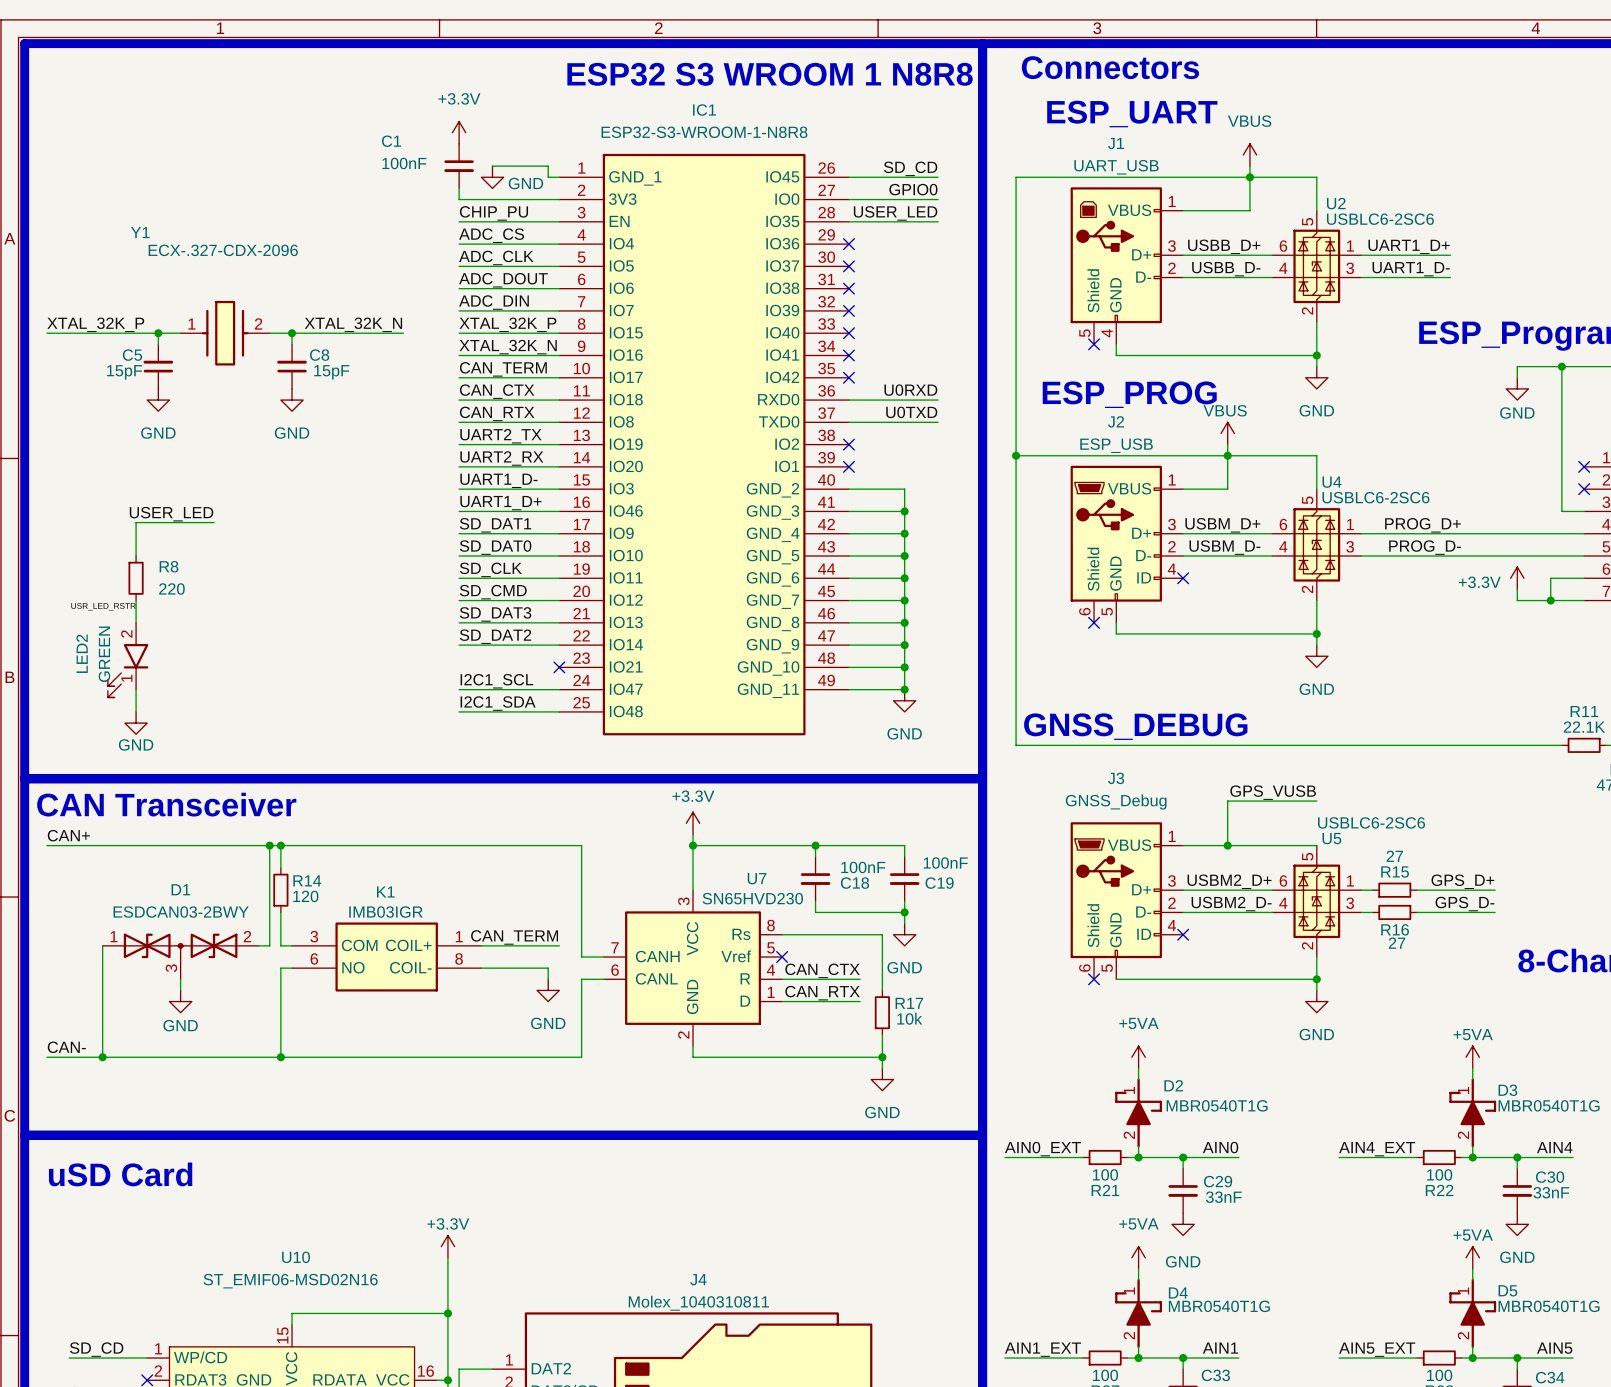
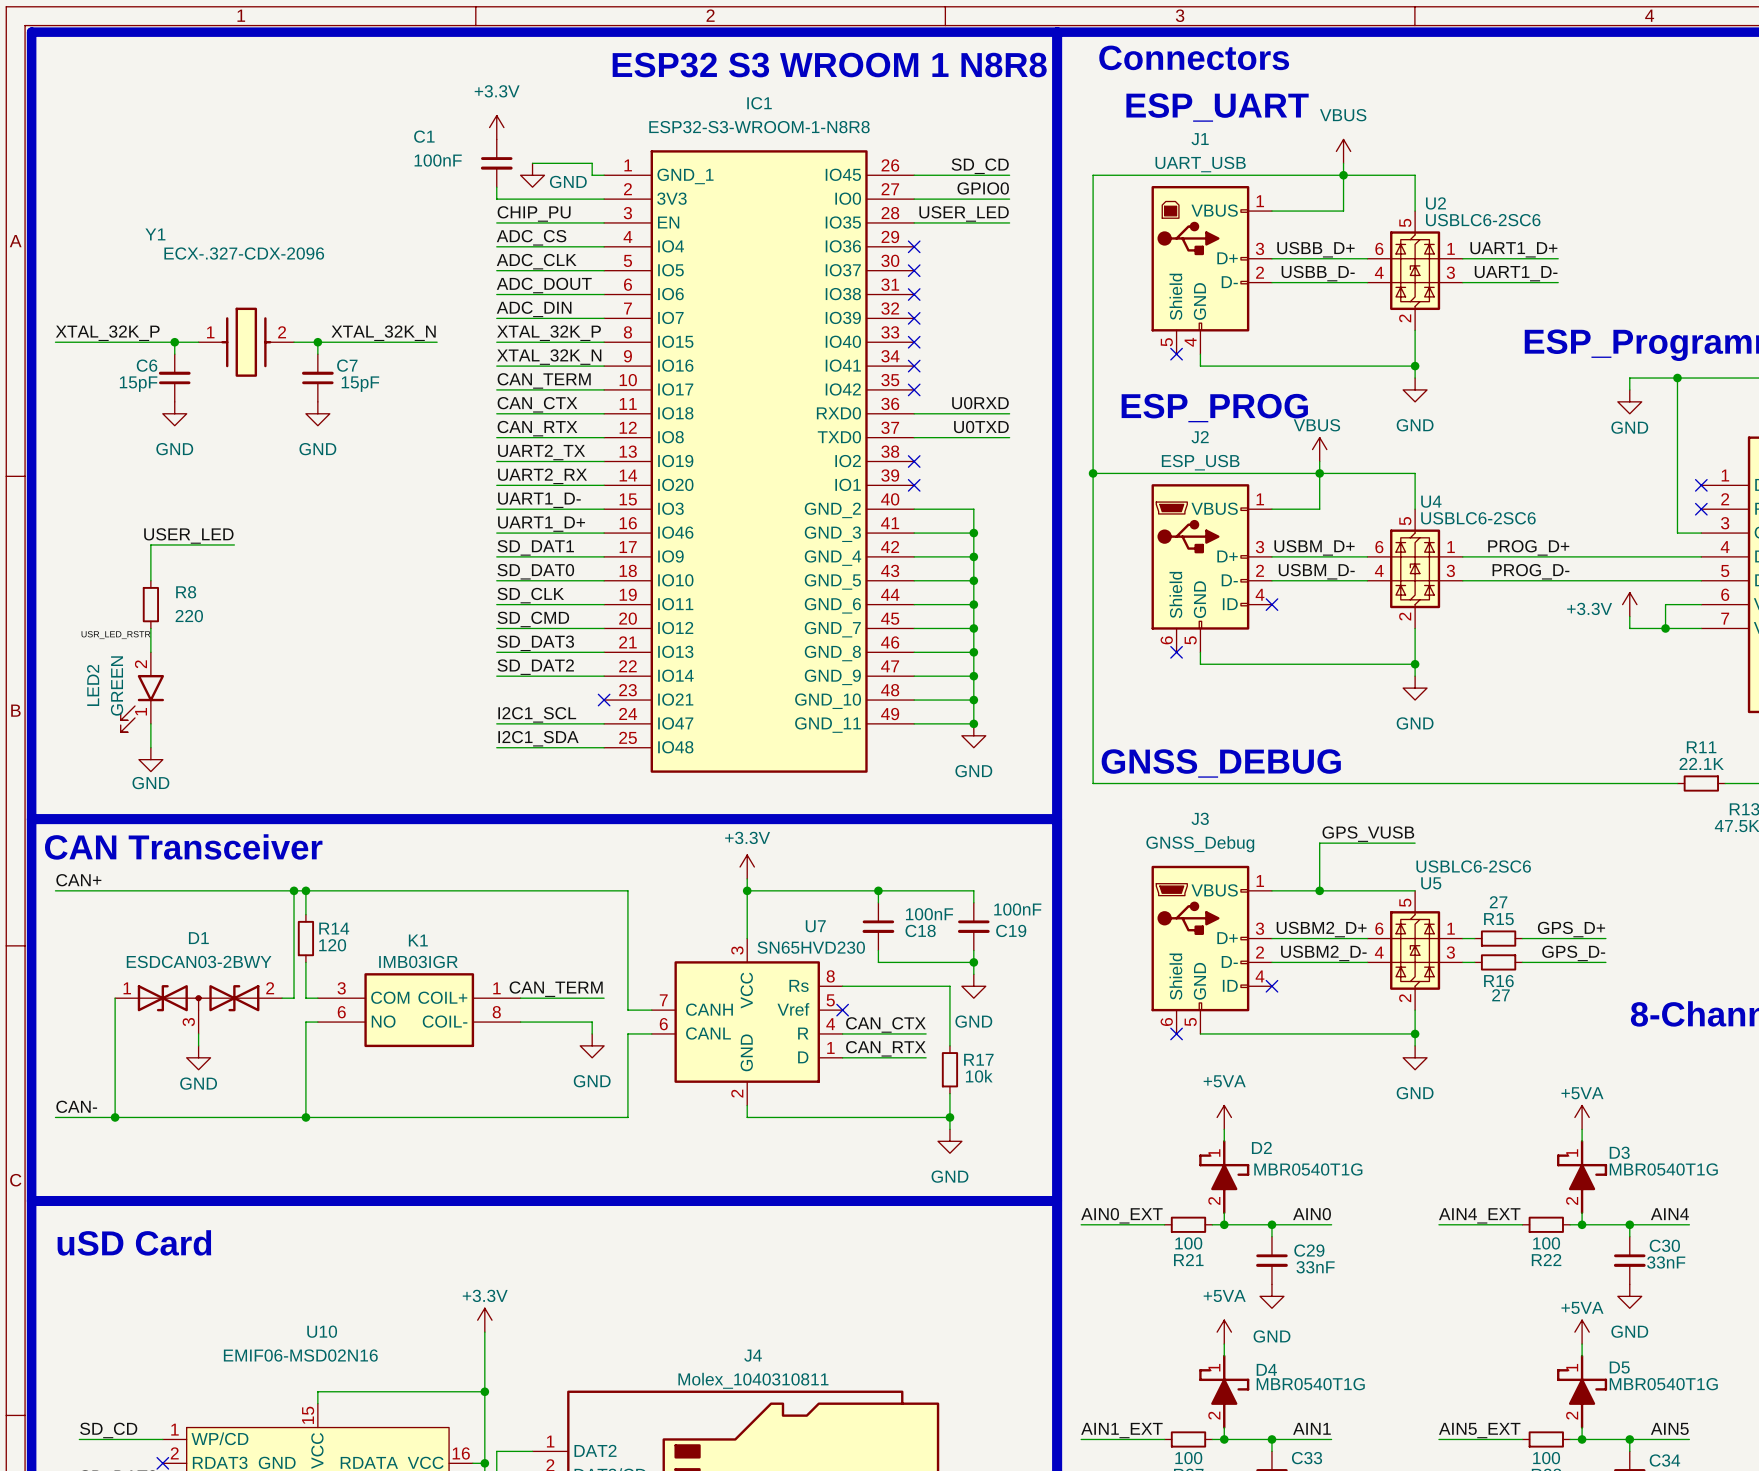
C5 name: C5 (132, 355) -> C6 (147, 365)
C8 name: C8 (319, 355) -> C7 (347, 365)
U10 value: ST_EMIF06-MSD02N16 (290, 1281) -> EMIF06-MSD02N16 (300, 1355)

